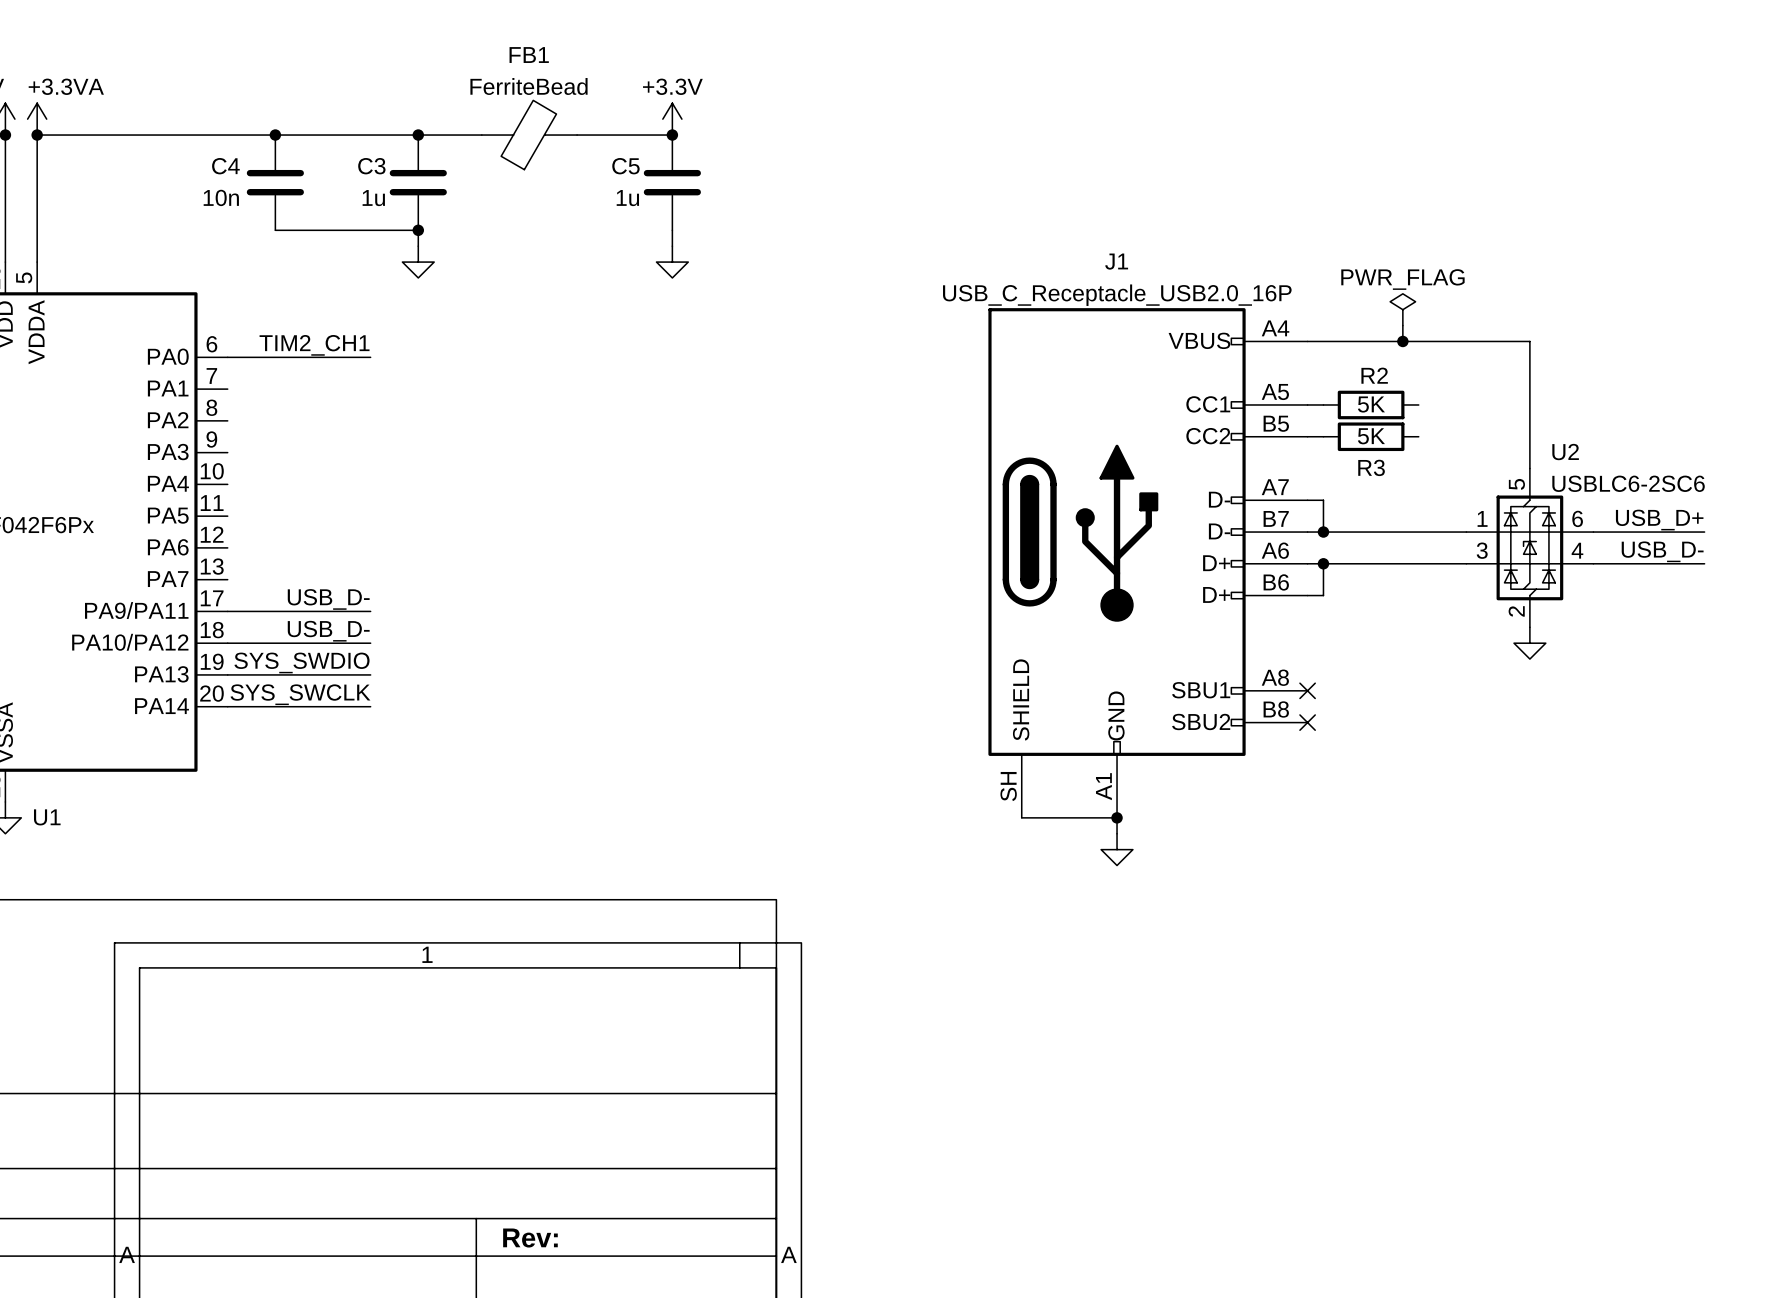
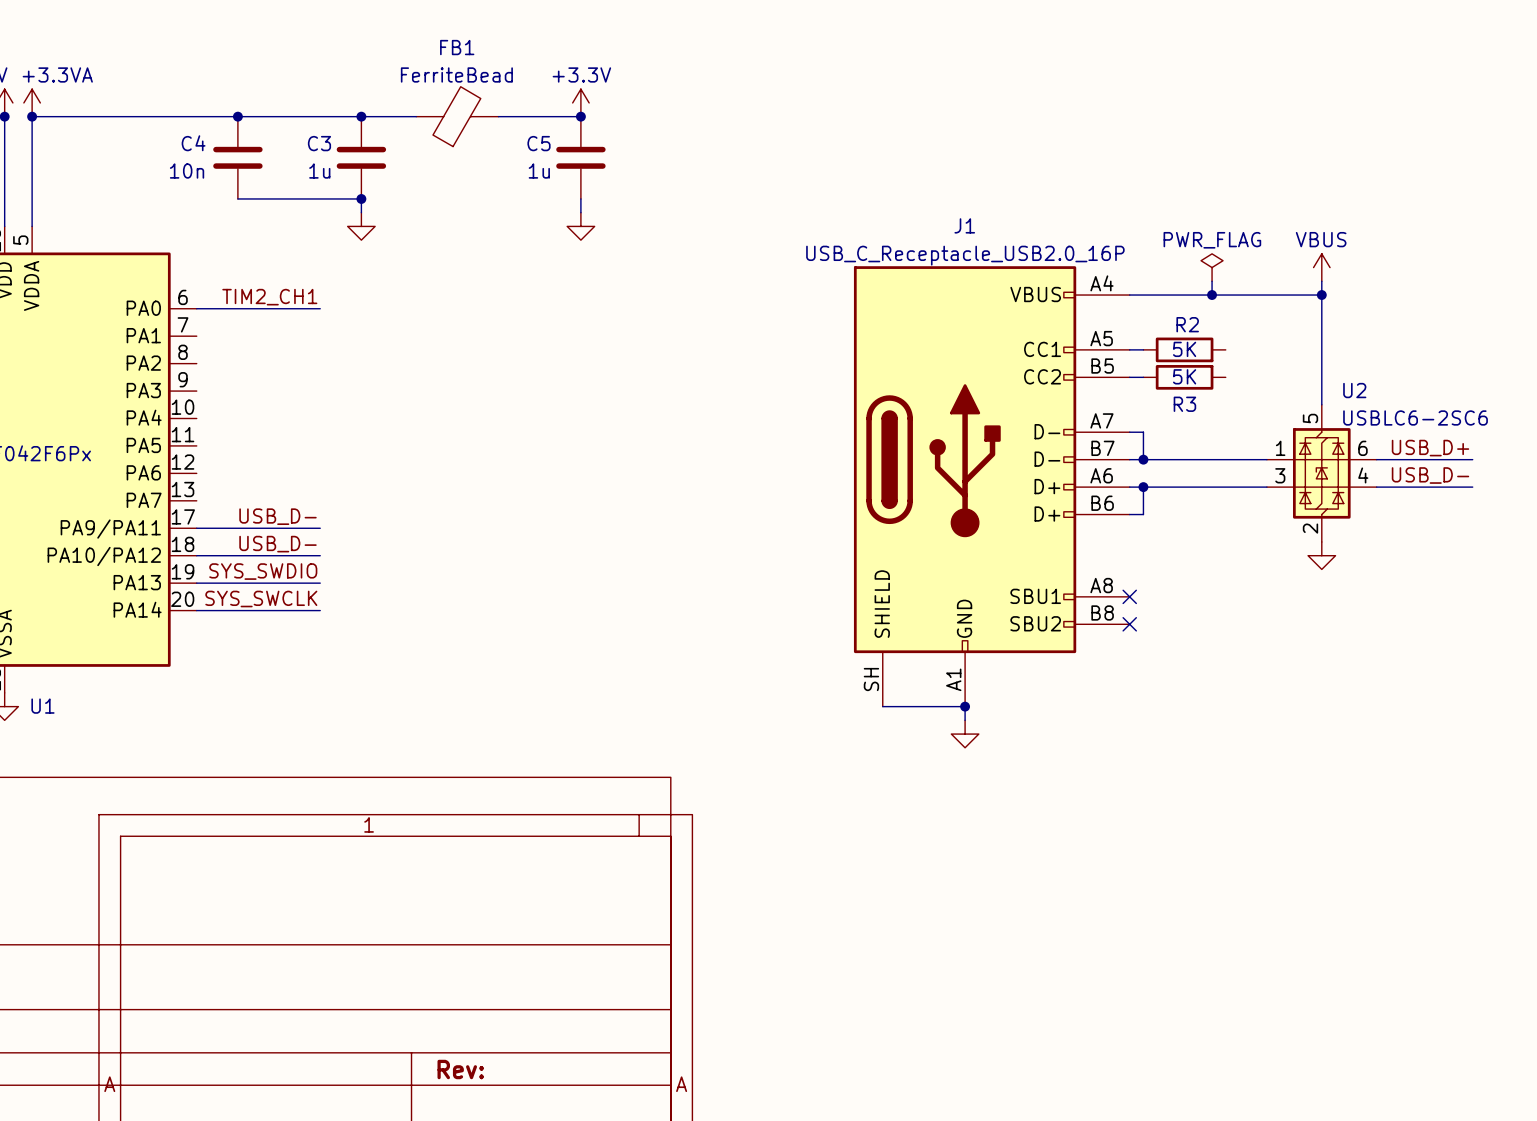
power symbol: none -> VBUS (1321, 267)
wire: none -> (1321, 281) (1321, 295)
junction: none -> (1321, 295)

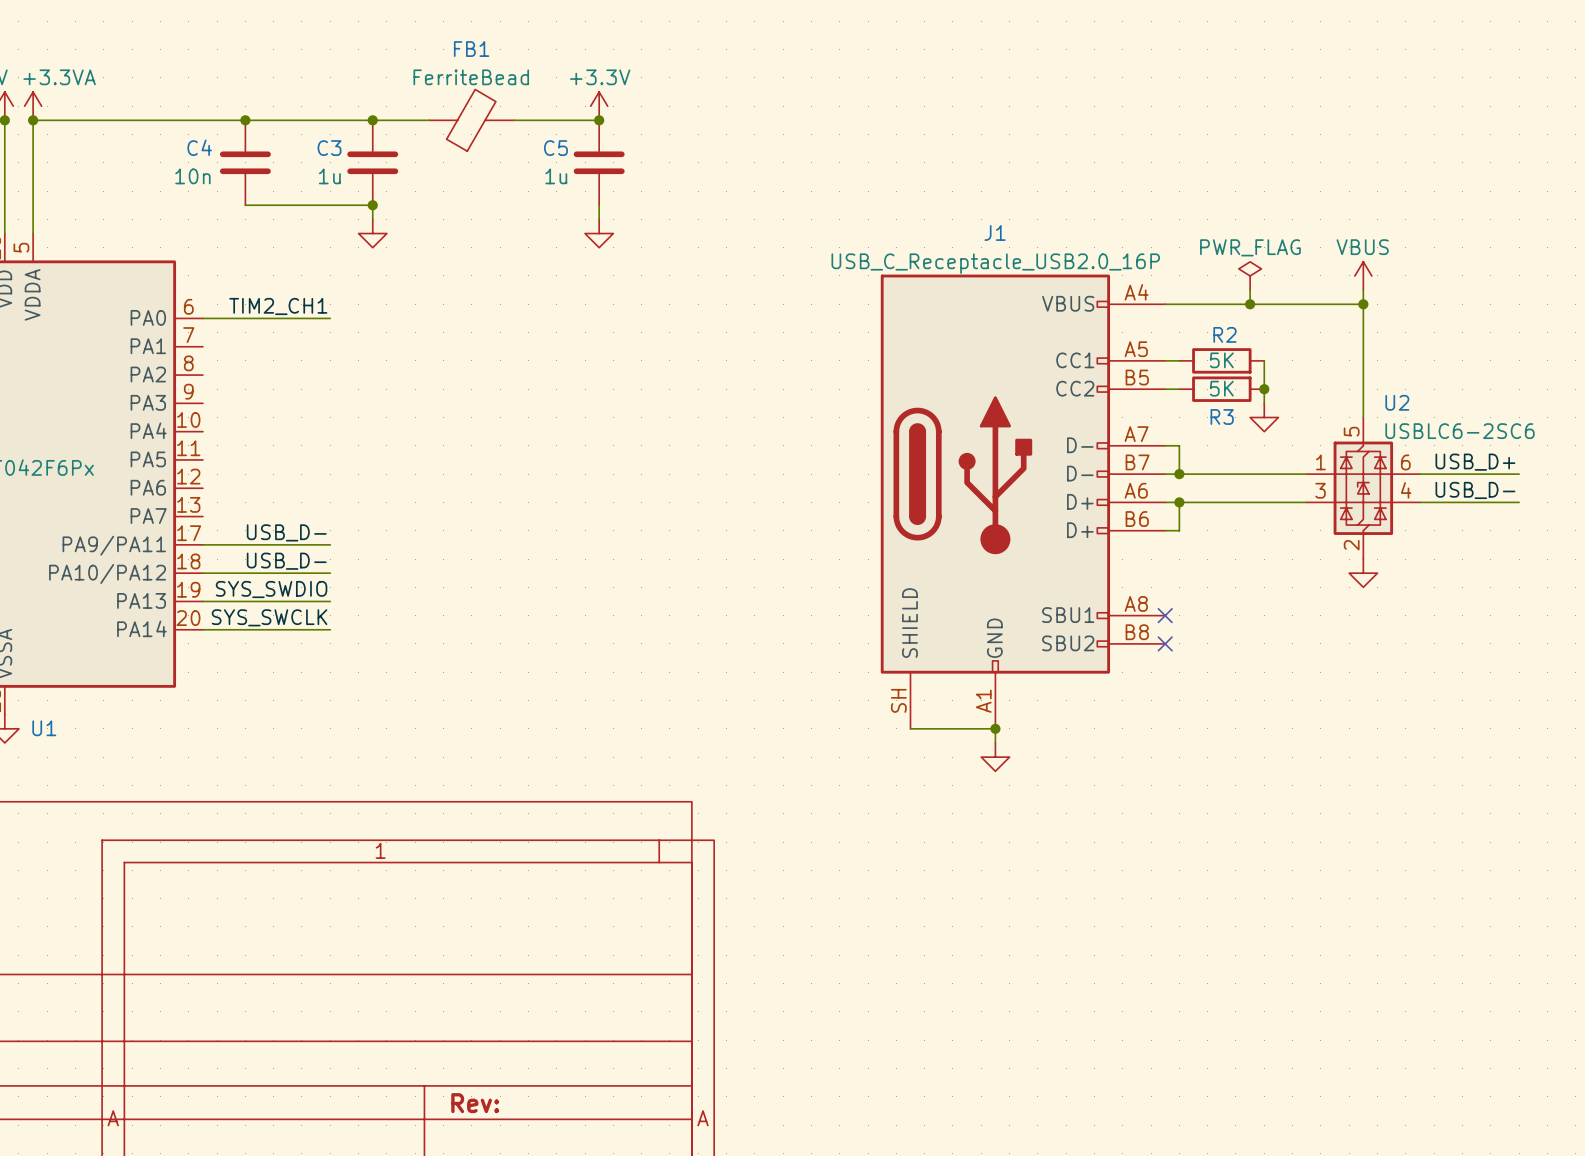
wire: none -> (1264, 360) (1264, 403)
junction: none -> (1264, 389)
power symbol: none -> (1264, 417)

